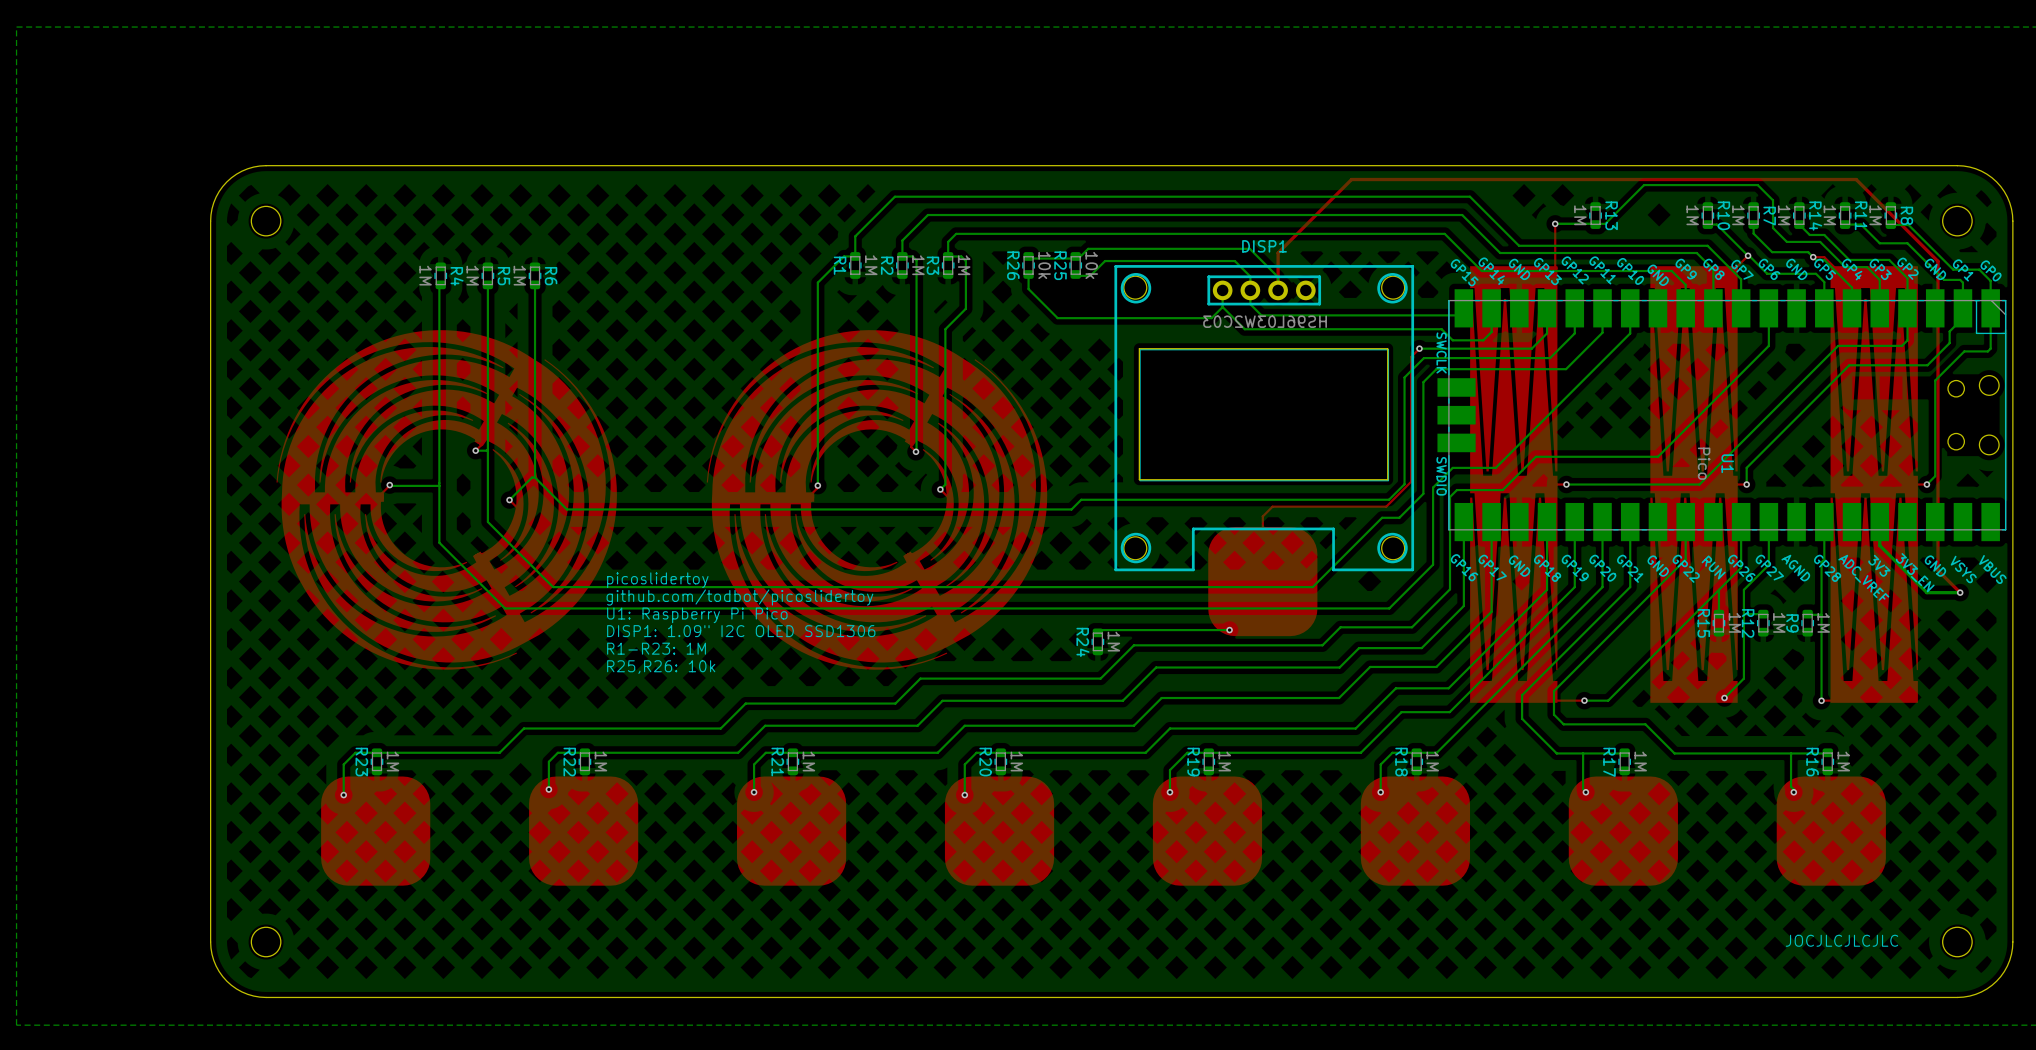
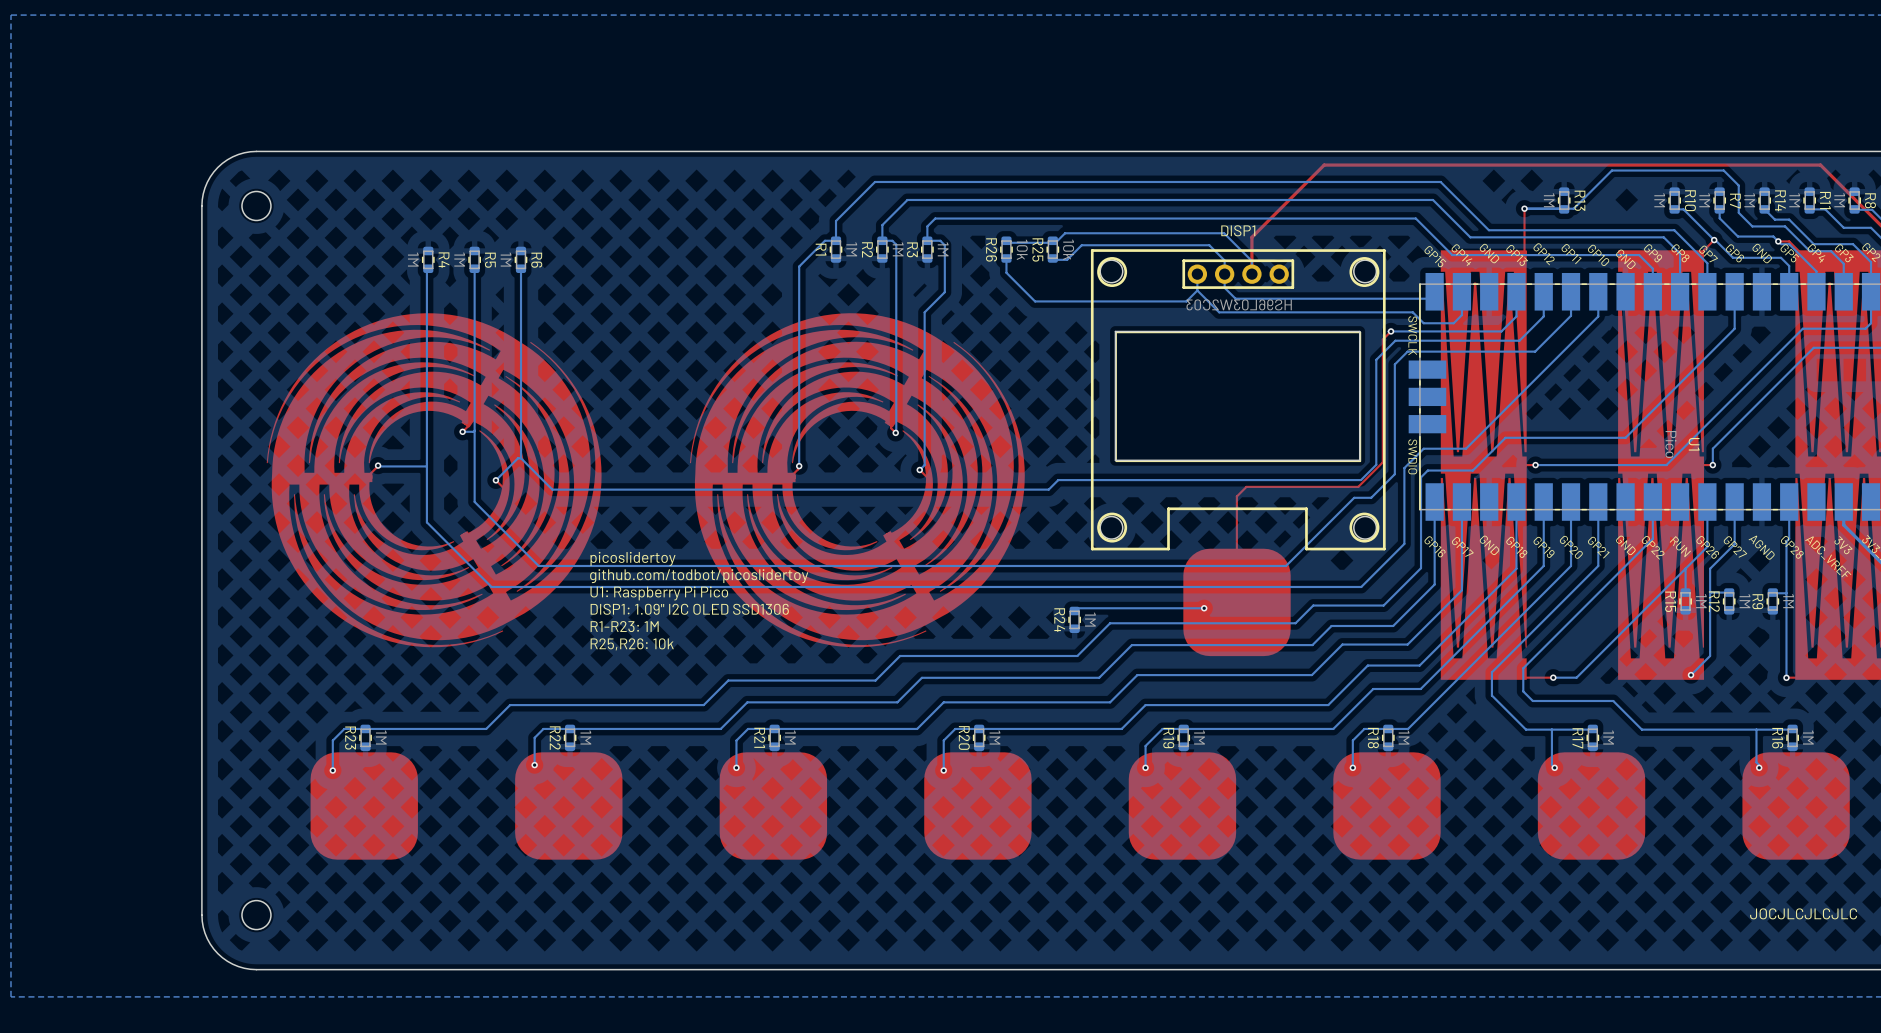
part position: (1262, 581) -> (1237, 602)

